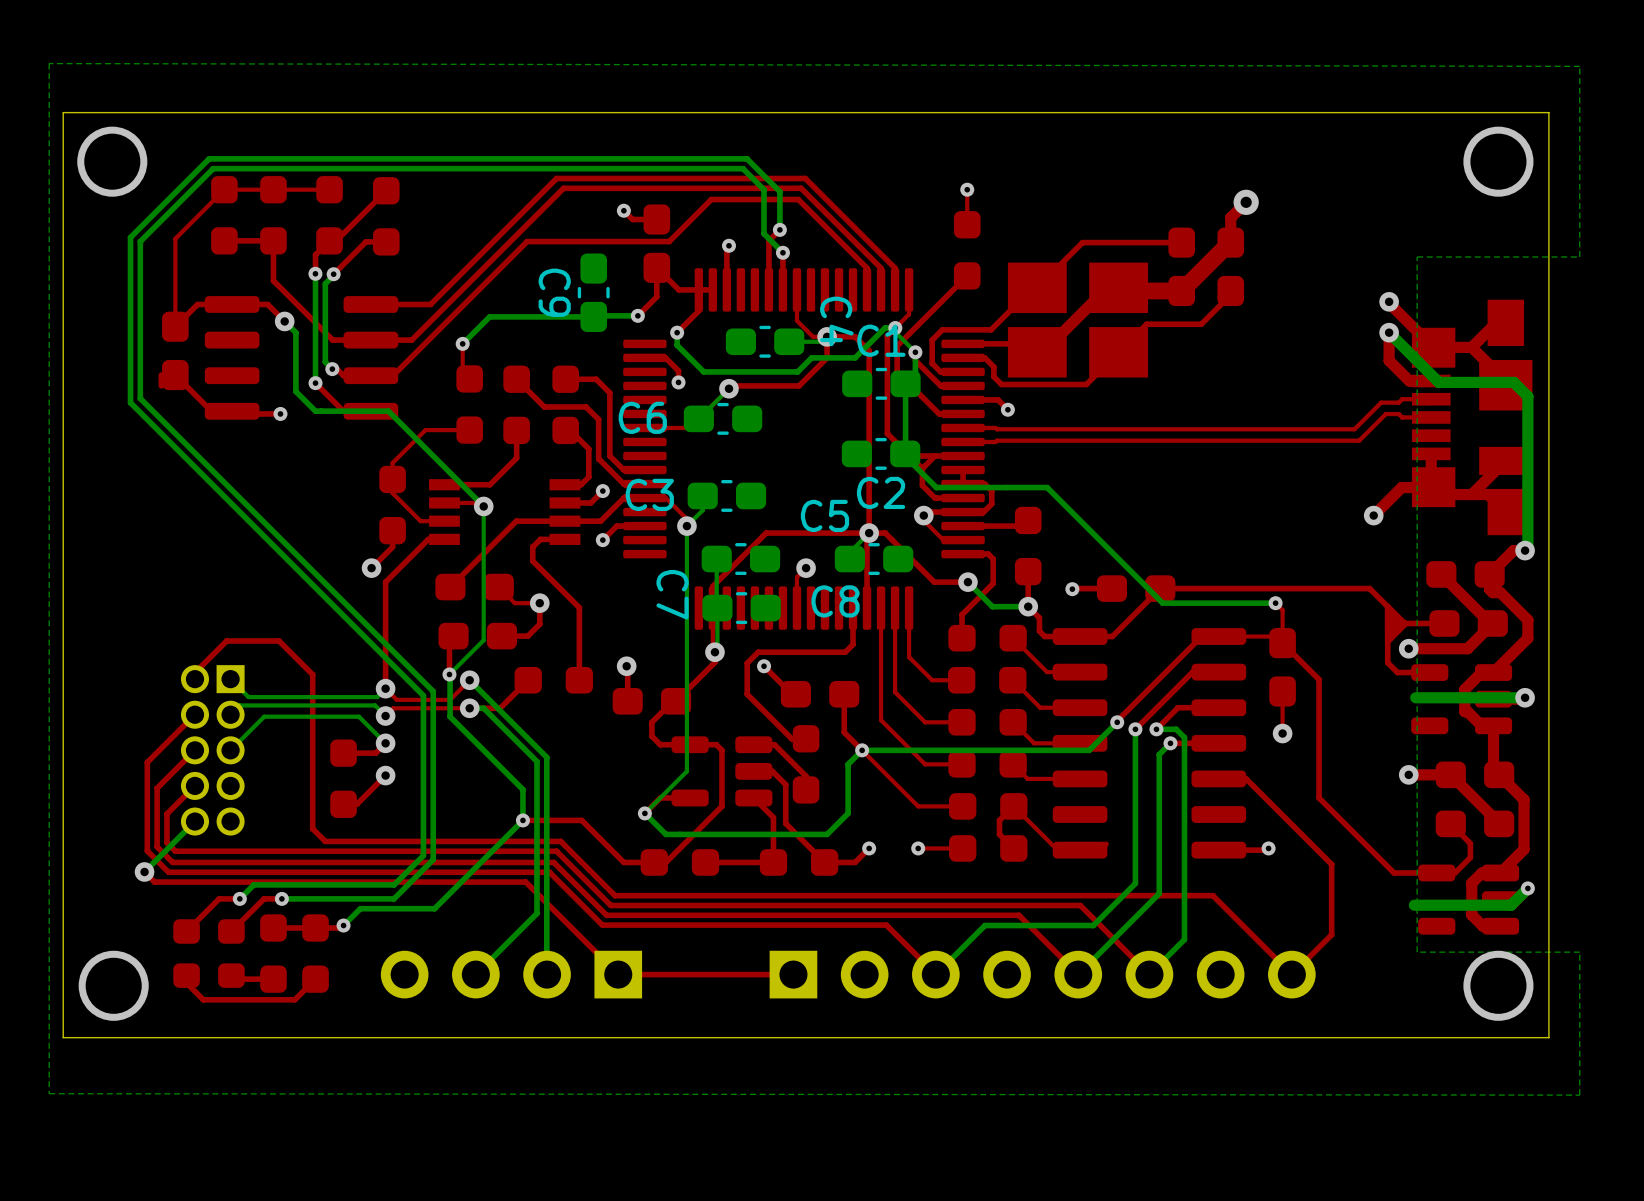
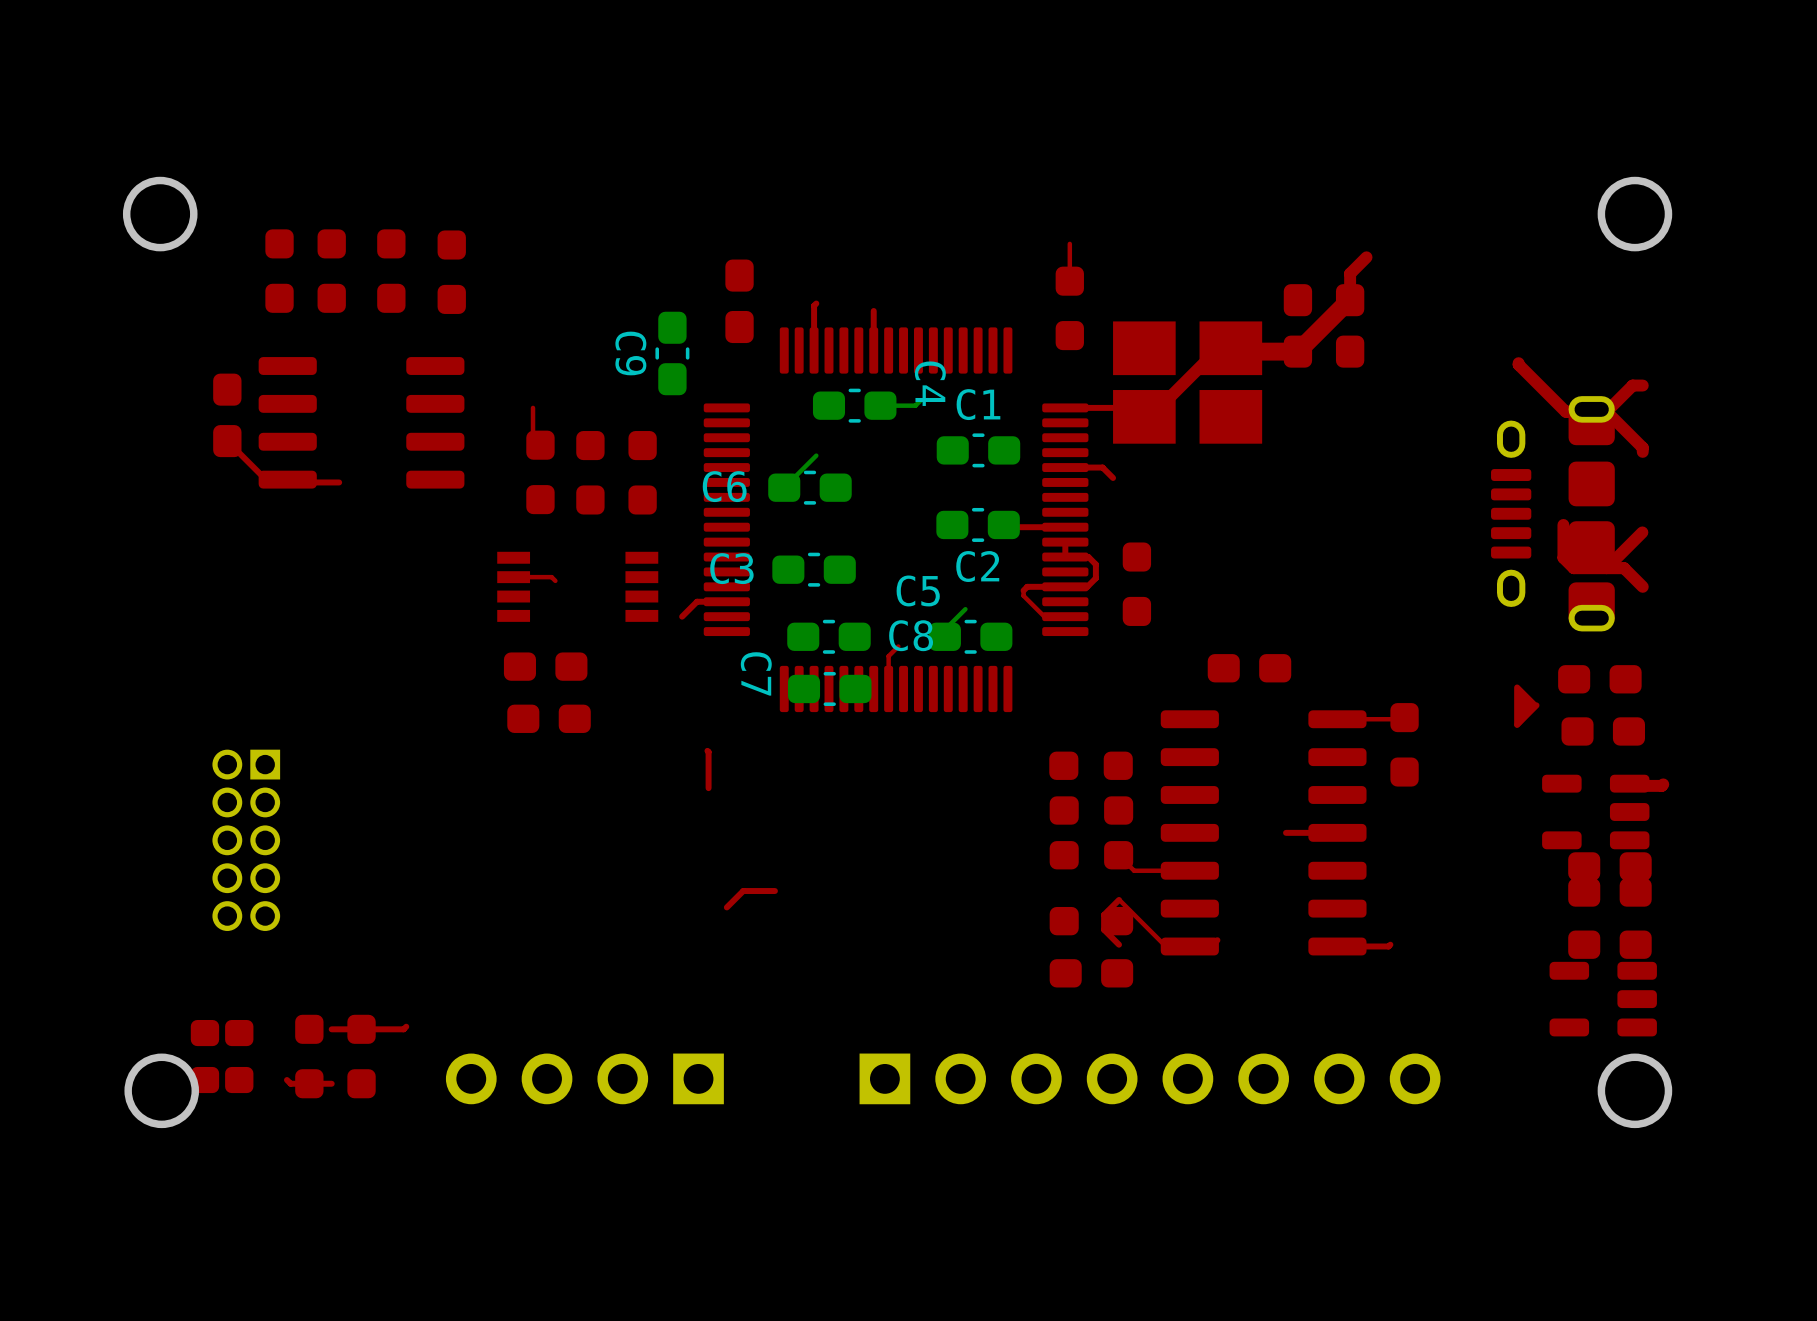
bottom zone outline: (49, 63) (49, 1093) (1579, 1095) (1579, 952) (1417, 952) (1417, 256) (1579, 256) (1579, 66) (49, 63) -> none
board edge: (1548, 112) (63, 112) (63, 1037) (1548, 1037) (1548, 112) -> none
top track: (329, 189) (224, 189) (175, 238) (175, 326) (197, 304) (267, 304) (284, 321) -> none
via: (967, 189) -> none
top track: (386, 190) (336, 240) (329, 240) (315, 254) (315, 273) -> none
via: (1246, 202) -> none
top track: (623, 210) (632, 219) (656, 219) -> none
via: (623, 210) -> none
top track: (779, 229) (768, 240) (768, 289) -> none
bottom track: (779, 229) (779, 191) (747, 158) (209, 158) (130, 237) (130, 402) (423, 695) (423, 855) (394, 884) (253, 884) (239, 898) -> none
via: (779, 229) -> none
top track: (224, 240) (273, 240) (273, 280) (332, 340) (411, 340) (563, 188) (801, 188) (881, 268) (881, 289) -> none
top track: (386, 241) (365, 241) (333, 274) -> none
top track: (1181, 242) (1082, 242) (1037, 287) (1033, 287) (991, 329) (942, 329) (932, 340) (932, 363) (940, 371) (963, 371) -> none
via: (728, 245) -> none
bottom track: (782, 252) (764, 233) (764, 189) (743, 168) (213, 168) (140, 241) (140, 398) (433, 691) (433, 859) (394, 898) (281, 898) -> none
via: (782, 252) -> none
bottom track: (315, 273) (315, 383) -> none
via: (315, 273) -> none
bottom track: (333, 274) (325, 283) (325, 362) (332, 369) -> none
via: (333, 274) -> none
top track: (967, 275) (897, 345) (897, 371) (939, 413) (963, 413) -> none
top track: (698, 289) (698, 310) (677, 332) -> none
top track: (712, 289) (678, 289) (656, 267) (656, 296) (637, 315) -> none
top track: (796, 289) (796, 320) (813, 336) (827, 336) -> none
top track: (867, 289) (867, 268) (798, 199) (711, 199) (669, 241) (527, 241) (393, 375) (343, 375) (336, 368) (332, 369) -> none
top track: (895, 289) (895, 268) (805, 178) (556, 178) (430, 304) (370, 304) -> none
top track: (909, 289) (909, 314) (887, 335) (887, 433) (922, 468) -> none
top track: (1230, 290) (1230, 294) (1201, 324) (1146, 324) (1086, 384) (1001, 384) (993, 376) (993, 367) (984, 357) (963, 357) -> none
via: (1389, 301) -> none
bottom track: (637, 315) (489, 316) (462, 343) -> none
via: (637, 315) -> none
bottom track: (284, 321) (295, 332) (295, 391) (315, 411) (388, 411) (483, 506) (483, 640) (449, 674) (450, 716) (522, 789) (522, 820) (434, 908) (360, 908) (343, 925) -> none
via: (284, 321) -> none
via: (895, 328) -> none
bottom track: (677, 332) (677, 345) (703, 371) (797, 371) (811, 357) (855, 357) (885, 328) (895, 328) (895, 332) (915, 352) (915, 374) (905, 383) (905, 442) -> none
via: (677, 332) -> none
top track: (1389, 332) (1389, 360) (1409, 381) (1431, 381) -> none
bottom track: (1389, 332) (1438, 382) (1513, 382) (1527, 396) (1527, 547) (1525, 550) -> none
via: (1389, 332) -> none
top track: (827, 336) (855, 336) (869, 350) (867, 608) -> none
top track: (827, 336) (827, 357) (799, 385) (731, 385) (689, 427) (644, 427) -> none
via: (827, 336) -> none
via: (462, 343) -> none
top track: (915, 352) (915, 360) (940, 385) (963, 385) -> none
via: (915, 352) -> none
top track: (644, 357) (665, 357) (678, 370) (678, 382) -> none
via: (332, 369) -> none
top track: (161, 375) (161, 385) -> none
top track: (516, 379) (544, 406) (586, 406) (598, 419) (598, 458) (623, 484) (644, 484) -> none
top track: (565, 379) (596, 379) (609, 392) (609, 456) (623, 470) (644, 470) -> none
via: (678, 382) -> none
top track: (315, 383) (343, 411) (370, 411) -> none
via: (315, 383) -> none
via: (728, 388) -> none
top track: (1427, 403) (1431, 399) (1402, 399) (1398, 402) (1381, 402) (1354, 429) (963, 427) -> none
via: (1007, 409) -> none
via: (280, 413) -> none
top track: (1431, 417) (1402, 417) (1398, 414) (1385, 414) (1359, 440) (963, 441) -> none
part: (1472, 417) -> none
top track: (469, 430) (425, 430) (392, 463) (392, 493) (420, 521) (444, 521) -> none
top track: (516, 430) (516, 458) (490, 484) (444, 484) -> none
top track: (565, 430) (570, 430) (588, 449) (588, 477) (581, 484) (565, 484) -> none
bottom track: (905, 443) (905, 456) (936, 487) (1047, 487) (1162, 603) (1275, 603) -> none
part: none -> (1552, 513)
top track: (935, 456) (922, 468) -> none
top track: (922, 468) (922, 485) (935, 498) (963, 498) -> none
top track: (1433, 487) (1401, 487) (1373, 515) -> none
top track: (602, 491) (590, 502) (565, 502) -> none
via: (602, 491) -> none
bottom track: (702, 495) (702, 510) (686, 526) (686, 771) (644, 813) (665, 834) (827, 834) (848, 813) (848, 764) (862, 750) (1089, 750) (1117, 722) -> none
part: (392, 505) -> none
via: (483, 506) -> none
via: (923, 515) -> none
via: (1373, 515) -> none
top track: (1028, 520) (1022, 526) (963, 526) -> none
top track: (686, 526) (686, 519) (665, 498) (623, 498) (600, 521) (516, 521) (450, 587) -> none
via: (686, 526) -> none
top track: (392, 530) (392, 547) (371, 568) -> none
via: (869, 533) -> none
top track: (444, 539) (428, 539) (385, 582) (385, 688) (396, 699) (450, 699) (469, 680) -> none
top track: (565, 539) (540, 539) (532, 547) (532, 561) (579, 607) (579, 680) -> none
via: (602, 540) -> none
part position: (1028, 546) -> (1136, 584)
top track: (1525, 550) (1513, 550) (1489, 574) (1489, 589) (1492, 592) (1500, 592) (1527, 619) (1527, 638) (1493, 672) (1481, 672) (1464, 689) (1464, 711) (1467, 711) (1481, 725) (1493, 725) (1493, 769) (1524, 799) (1524, 849) (1500, 872) (1481, 872) (1471, 883) (1471, 915) (1483, 926) (1500, 926) -> none
via: (1525, 550) -> none
top track: (963, 554) (988, 554) (993, 559) (993, 583) (962, 614) (962, 638) (962, 629) -> none
bottom track: (716, 559) (717, 649) (714, 652) -> none
via: (371, 568) -> none
via: (806, 568) -> none
top track: (1028, 571) (1028, 606) (1039, 617) (1039, 631) (1044, 636) (1112, 636) (1160, 588) (1369, 588) (1404, 623) (1444, 623) -> none
top track: (1441, 574) (1490, 623) (1492, 623) (1467, 648) (1408, 648) -> none
part: (1465, 574) -> none
top track: (967, 582) (934, 582) (885, 533) (766, 533) (712, 586) (712, 650) (714, 652) (714, 662) (651, 722) (651, 736) (660, 744) (716, 744) (721, 750) (721, 806) (665, 862) (623, 862) (581, 820) (522, 820) -> none
bottom track: (967, 582) (992, 606) (1028, 606) -> none
via: (967, 582) -> none
top track: (498, 587) (514, 603) (539, 603) (539, 624) (527, 636) (501, 636) -> none
top track: (1111, 588) (1072, 589) -> none
via: (1072, 589) -> none
part: none -> (1599, 679)
C8 name position: C8 (835, 601) -> C8 (911, 635)
via: (539, 603) -> none
top track: (1275, 603) (1282, 610) (1282, 643) (1319, 679) (1319, 797) (1394, 872) (1455, 872) (1470, 857) (1470, 843) (1450, 823) -> none
via: (1275, 603) -> none
via: (1028, 606) -> none
top track: (1387, 606) (1387, 662) (1397, 672) (1429, 672) -> none
top track: (853, 608) (853, 644) (845, 652) (758, 652) (747, 663) (747, 694) (791, 738) (806, 738) -> none
top track: (881, 608) (881, 720) (925, 764) (962, 764) -> none
top track: (895, 608) (895, 692) (925, 722) (962, 722) -> none
top track: (909, 608) (909, 657) (932, 680) (961, 680) -> none
part: (1468, 623) -> none
part footprint: [1269, 628, 1296, 707] -> [1390, 703, 1419, 787]
top track: (1220, 634) (1201, 636) (1117, 722) -> none
top track: (453, 636) (449, 640) (449, 674) -> none
part: (987, 638) -> none
top track: (1013, 638) (1047, 672) (1080, 672) -> none
via: (1408, 648) -> none
part: none -> (1603, 731)
via: (714, 652) -> none
via: (626, 666) -> none
top track: (764, 666) (792, 694) (795, 694) -> none
via: (764, 666) -> none
top track: (1218, 672) (1192, 672) (1135, 729) -> none
via: (449, 674) -> none
top track: (194, 679) (194, 672) (226, 641) (279, 641) (312, 674) (312, 828) (325, 841) (560, 841) (615, 895) (1212, 895) (1291, 974) -> none
bottom track: (230, 679) (248, 697) (377, 697) (385, 688) -> none
bottom track: (469, 680) (546, 757) (546, 974) -> none
via: (469, 680) -> none
top track: (528, 680) (500, 708) (393, 708) (385, 716) -> none
part: (553, 680) -> none
top track: (1012, 680) (1040, 707) (1080, 707) -> none
via: (385, 688) -> none
top track: (1282, 691) (1282, 733) -> none
part: (820, 694) -> none
top track: (844, 694) (844, 732) (918, 806) (962, 806) -> none
bottom track: (1525, 697) (1415, 697) -> none
via: (1525, 697) -> none
part position: (1461, 699) -> (1595, 811)
part: (651, 701) -> none
top track: (1218, 707) (1178, 707) (1156, 729) -> none
bottom track: (469, 708) (483, 708) (536, 761) (536, 913) (475, 974) -> none
via: (469, 708) -> none
top track: (194, 714) (147, 762) (147, 850) (168, 872) (549, 872) (602, 925) (886, 925) (935, 974) -> none
bottom track: (230, 714) (239, 705) (375, 705) (385, 716) -> none
via: (385, 716) -> none
top track: (1013, 722) (1034, 743) (1080, 743) -> none
via: (1117, 722) -> none
bottom track: (1135, 729) (1135, 883) (1093, 925) (984, 925) (935, 974) -> none
via: (1135, 729) -> none
bottom track: (1156, 729) (1176, 729) (1184, 737) (1184, 939) (1149, 974) -> none
via: (1156, 729) -> none
via: (1282, 733) -> none
top track: (385, 743) (375, 753) (343, 753) -> none
bottom track: (385, 743) (358, 716) (264, 716) (230, 750) -> none
via: (385, 743) -> none
bottom track: (1170, 743) (1159, 754) (1159, 893) (1078, 974) -> none
via: (1170, 743) -> none
top track: (753, 744) (774, 744) (806, 776) (806, 789) -> none
top track: (194, 750) (157, 788) (157, 846) (172, 862) (553, 862) (606, 915) (1018, 915) (1078, 974) -> none
part position: (212, 750) -> (246, 840)
via: (862, 750) -> none
part: (806, 764) -> none
part: (721, 771) -> none
top track: (753, 771) (772, 771) (785, 784) (785, 823) (824, 862) (855, 862) (869, 848) -> none
top track: (1408, 774) (1450, 774) (1499, 823) -> none
via: (1408, 774) -> none
top track: (385, 775) (356, 804) (343, 804) -> none
via: (385, 775) -> none
part: (343, 778) -> none
top track: (1218, 778) (1246, 778) (1331, 864) (1331, 934) (1291, 974) -> none
top track: (194, 785) (166, 813) (166, 842) (175, 851) (556, 851) (610, 905) (1080, 905) (1149, 974) -> none
top track: (753, 797) (773, 817) (773, 862) (705, 862) -> none
part: none -> (1609, 892)
part: (988, 806) -> none
via: (644, 813) -> none
via: (522, 820) -> none
bottom track: (194, 821) (144, 871) -> none
part: (1474, 823) -> none
part: none -> (1091, 921)
via: (869, 848) -> none
via: (918, 848) -> none
top track: (962, 848) (918, 848) -> none
part: (988, 848) -> none
via: (1268, 848) -> none
part: none -> (1609, 944)
part: (679, 862) -> none
part: (799, 862) -> none
top track: (144, 871) (154, 882) (525, 882) (618, 974) (793, 974) -> none
via: (144, 871) -> none
part: none -> (1091, 973)
bottom track: (1527, 888) (1511, 905) (1414, 905) -> none
via: (1527, 888) -> none
top track: (239, 898) (219, 898) (186, 931) -> none
via: (239, 898) -> none
top track: (281, 898) (264, 898) (231, 931) -> none
via: (281, 898) -> none
via: (343, 925) -> none
part position: (231, 953) -> (204, 1056)
part: none -> (309, 1056)
part: (273, 953) -> none
part: none -> (361, 1056)
part: (315, 953) -> none
top track: (186, 975) (186, 983) (203, 999) (294, 999) (315, 979) -> none

